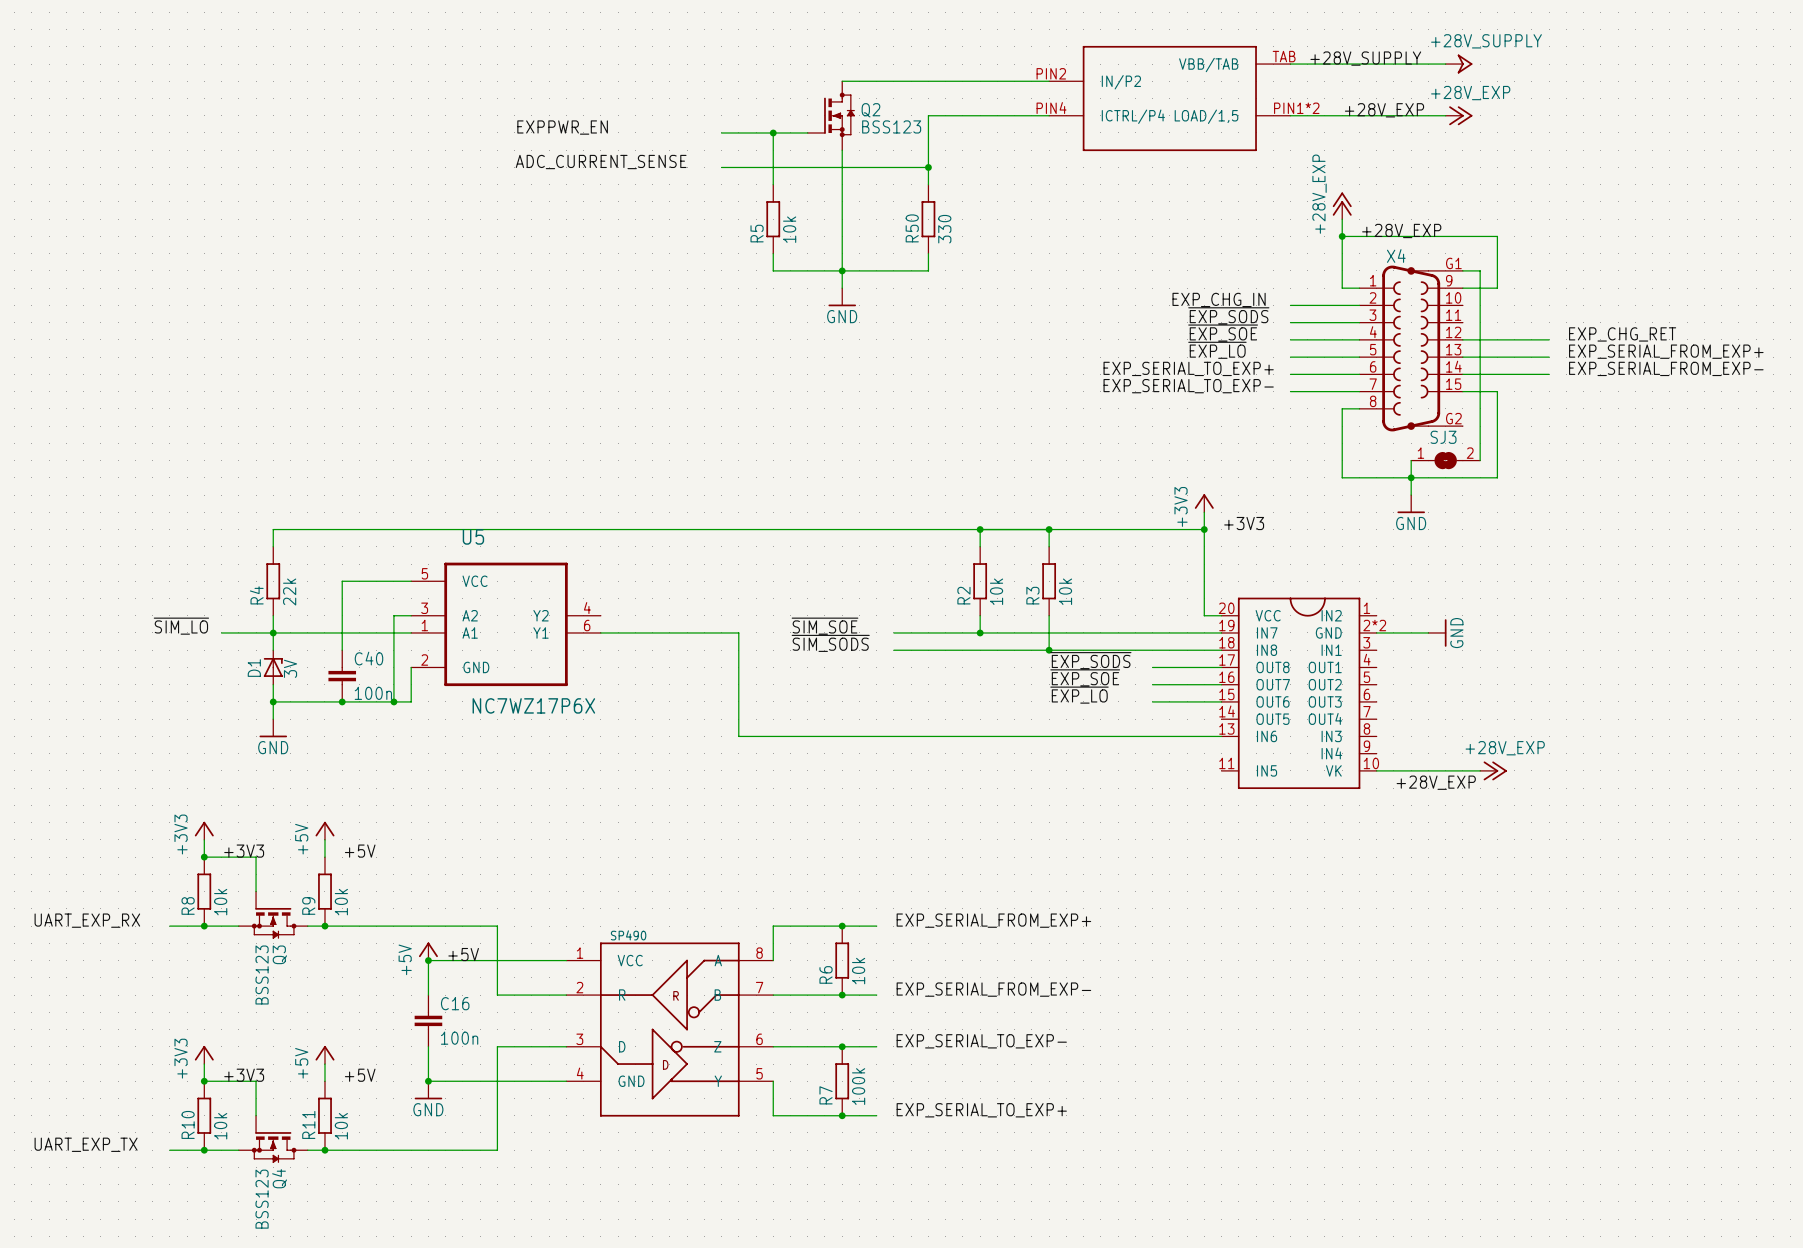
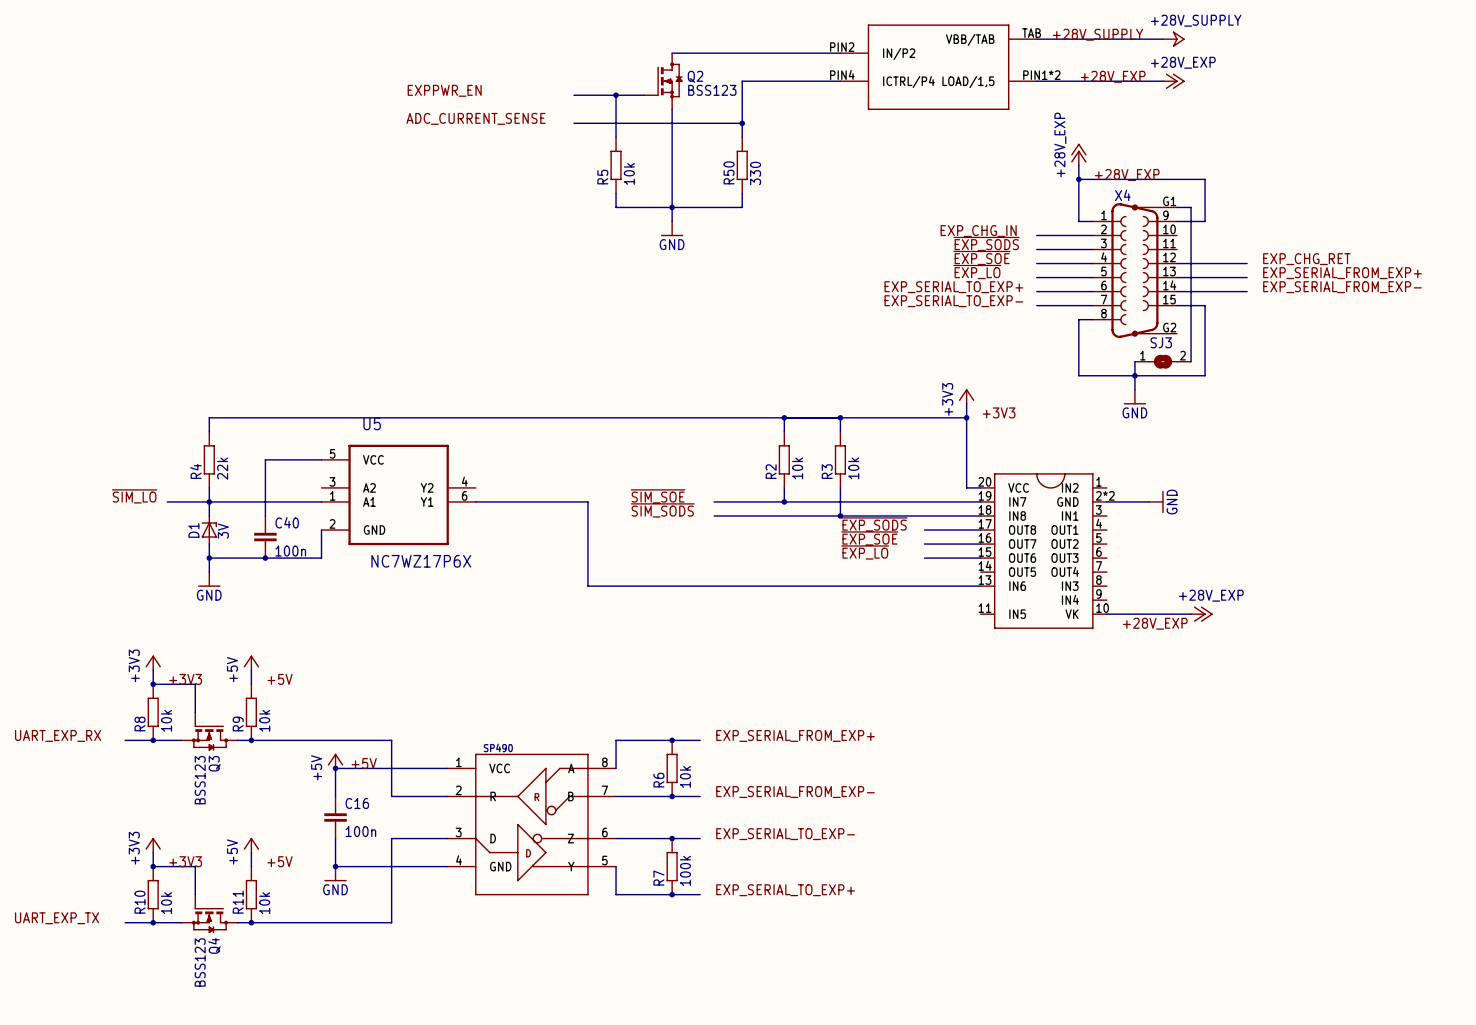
wire: (411, 615) (393, 615) (393, 701) -> none
junction: (393, 701) -> none

